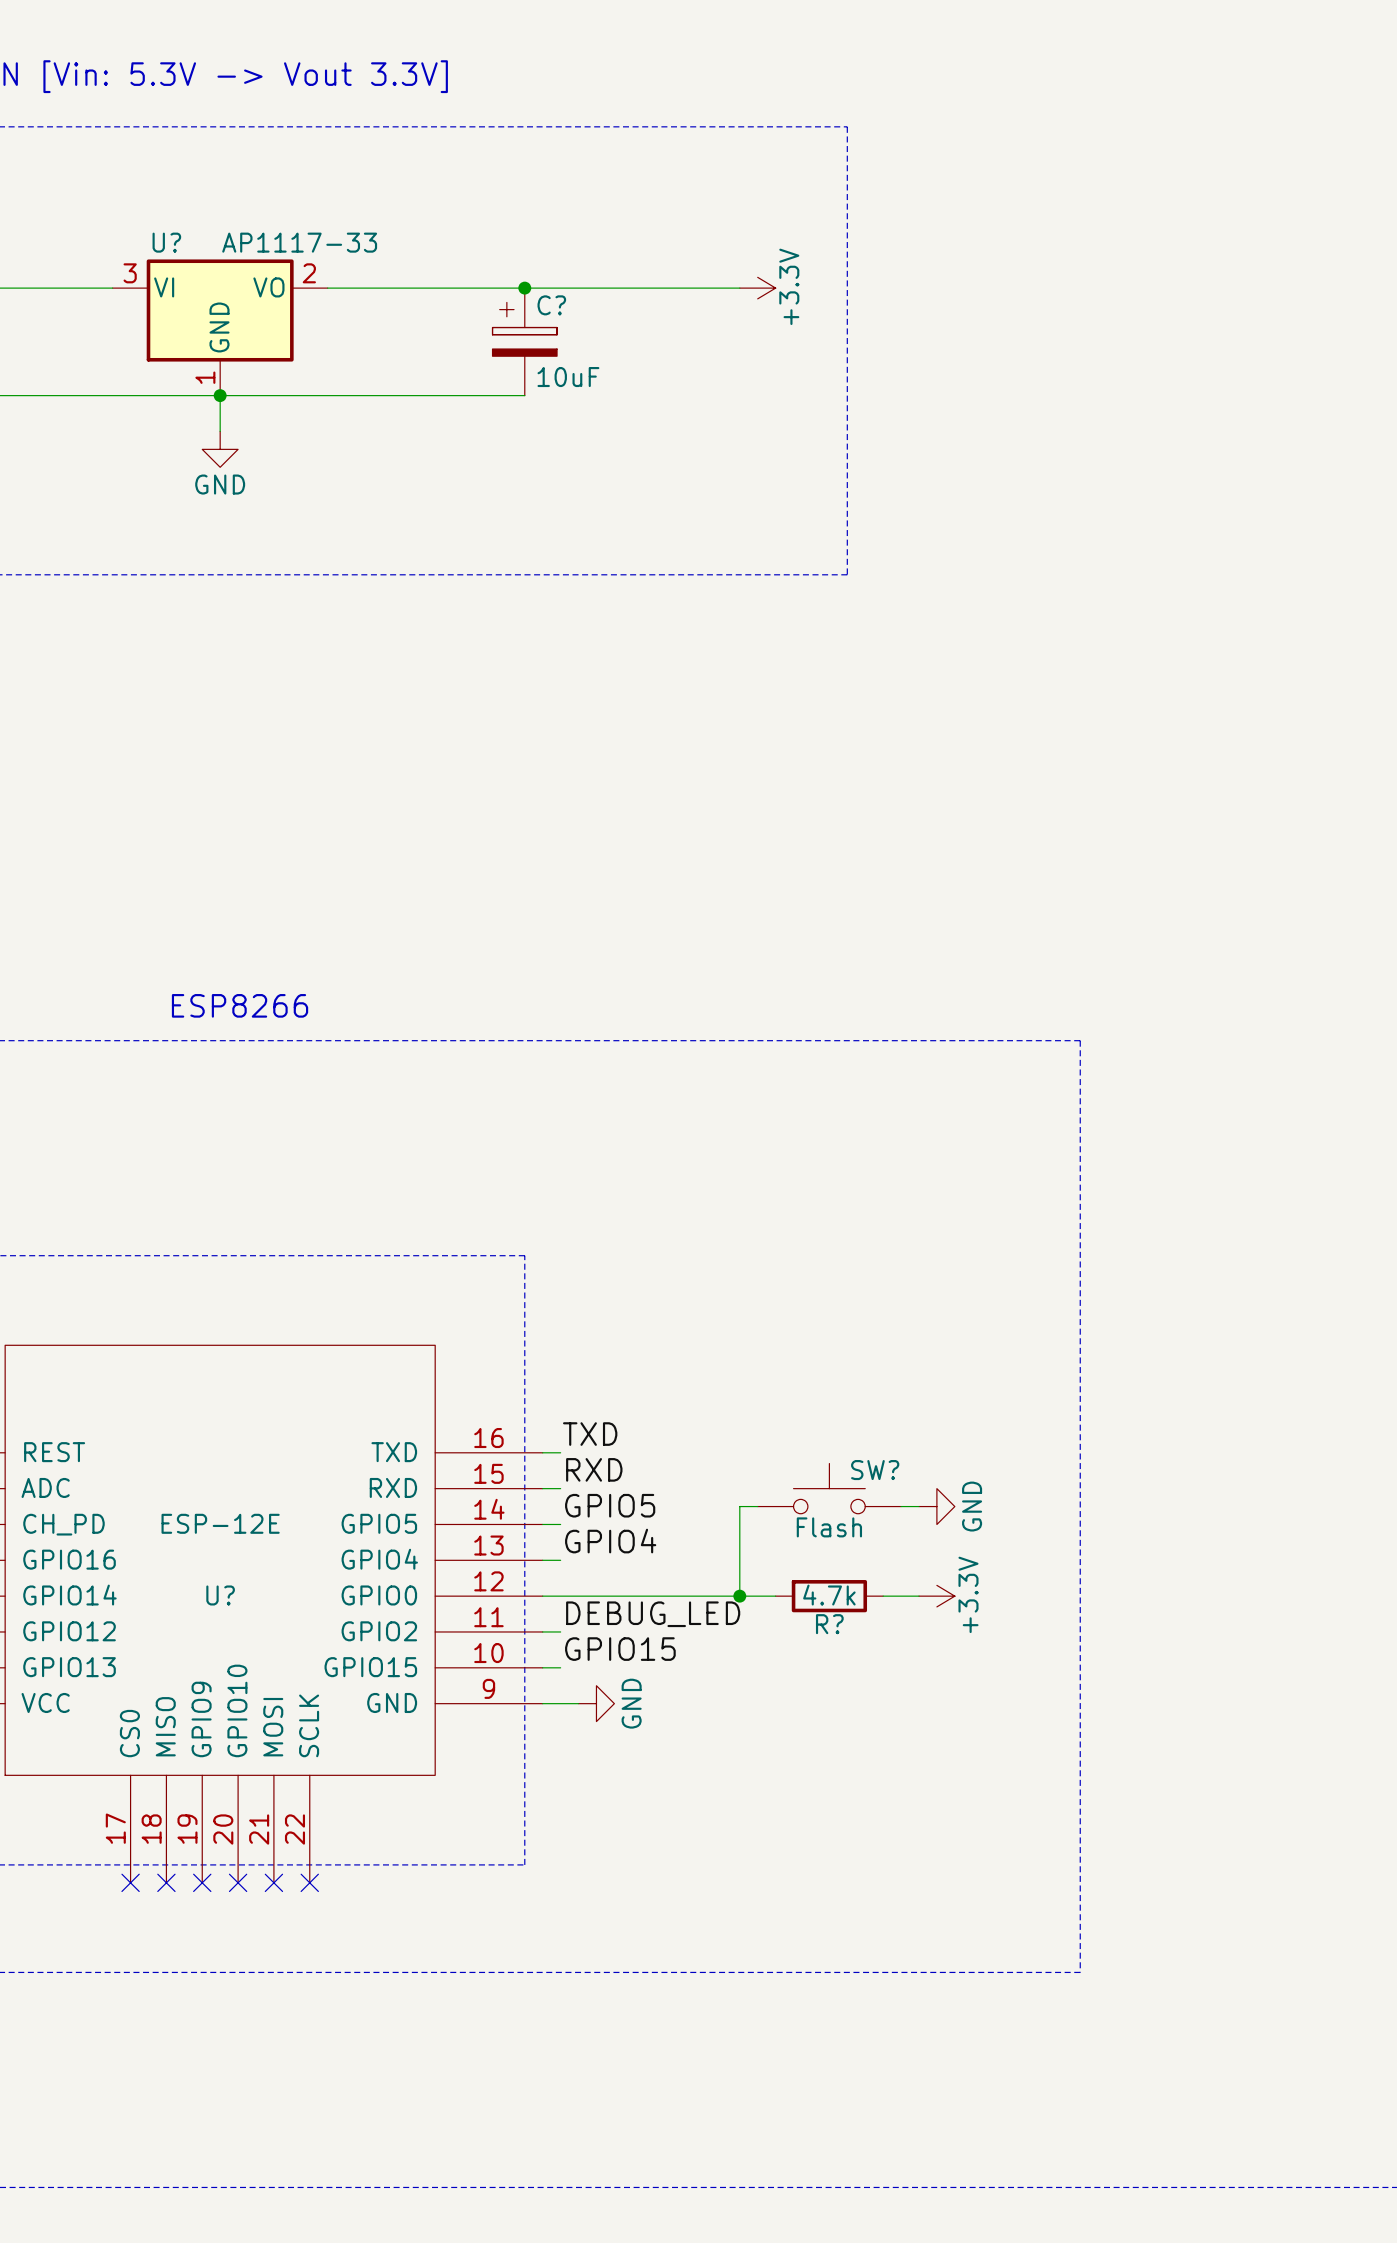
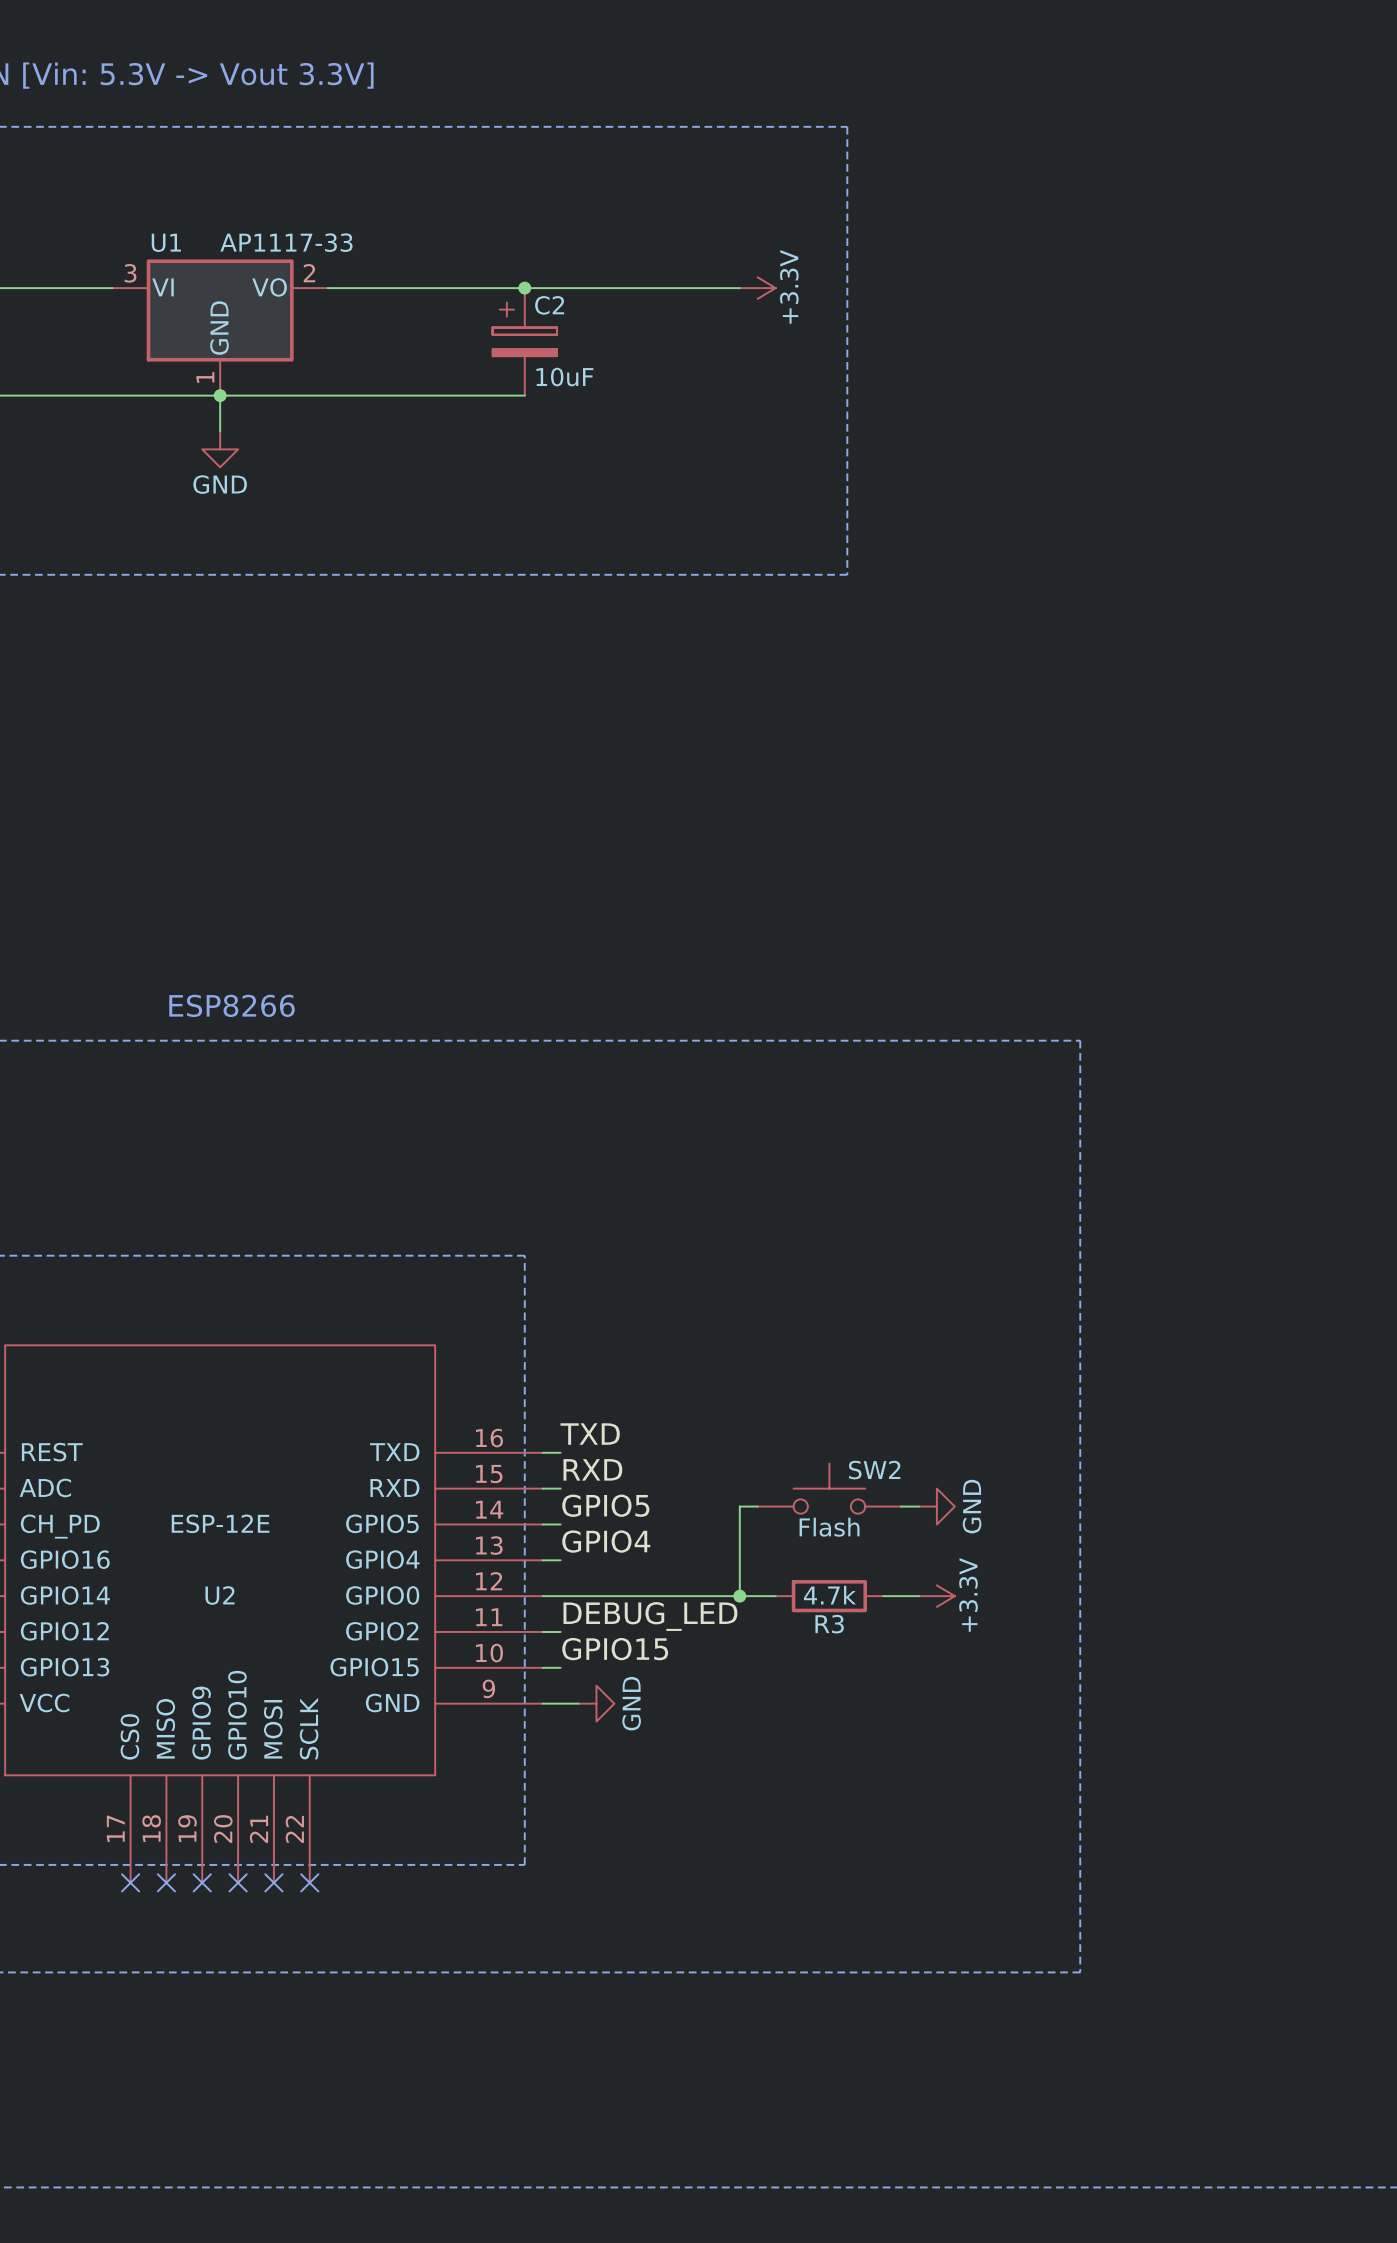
U? name: U? (166, 242) -> U1 (166, 242)
C? name: C? (551, 305) -> C2 (549, 305)
SW? name: SW? (875, 1470) -> SW2 (874, 1470)
U? name: U? (220, 1595) -> U2 (220, 1595)
R? name: R? (829, 1624) -> R3 (829, 1624)

